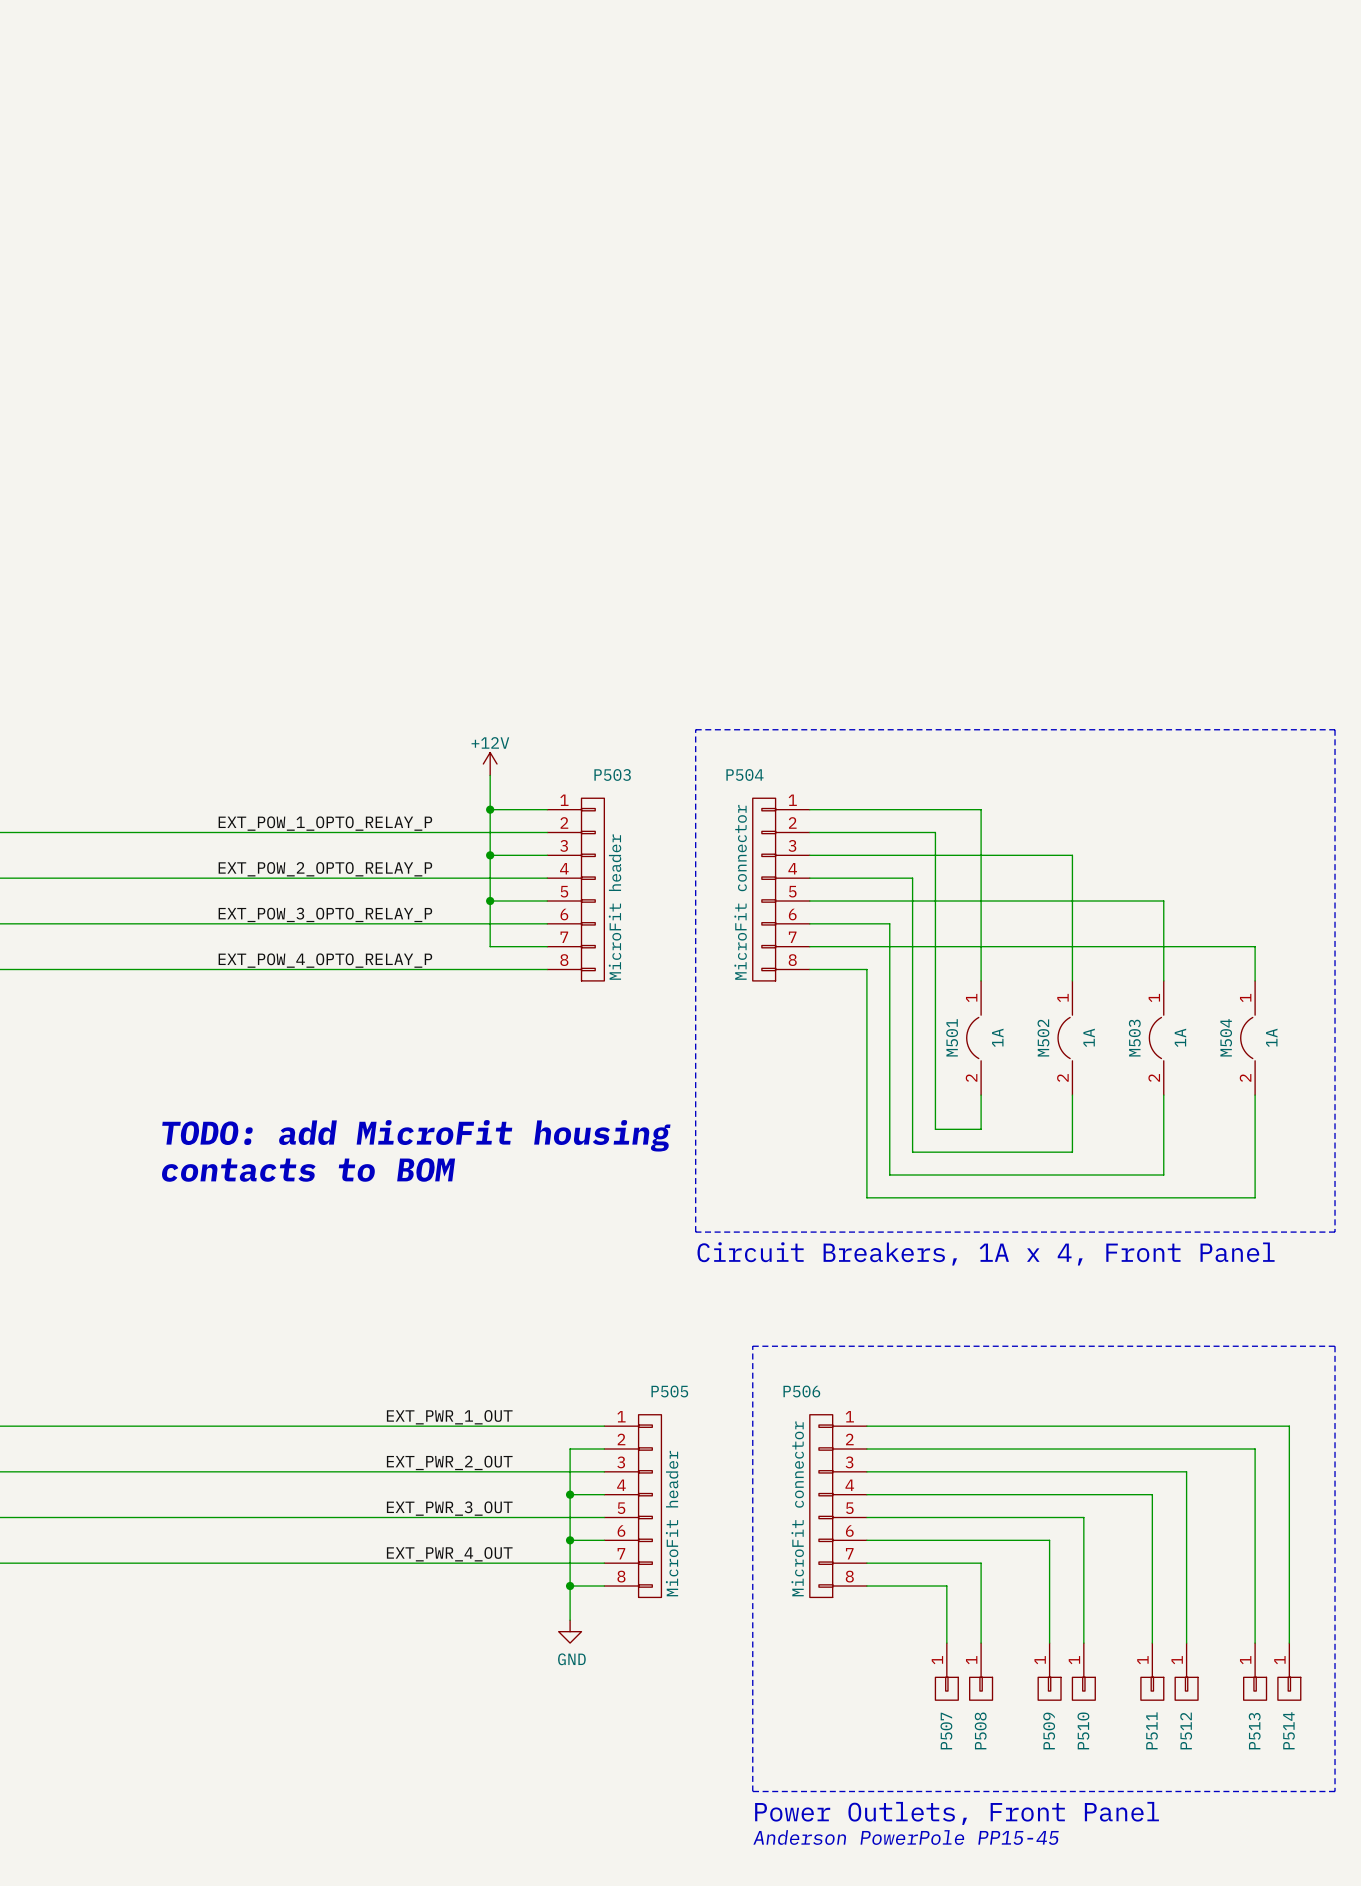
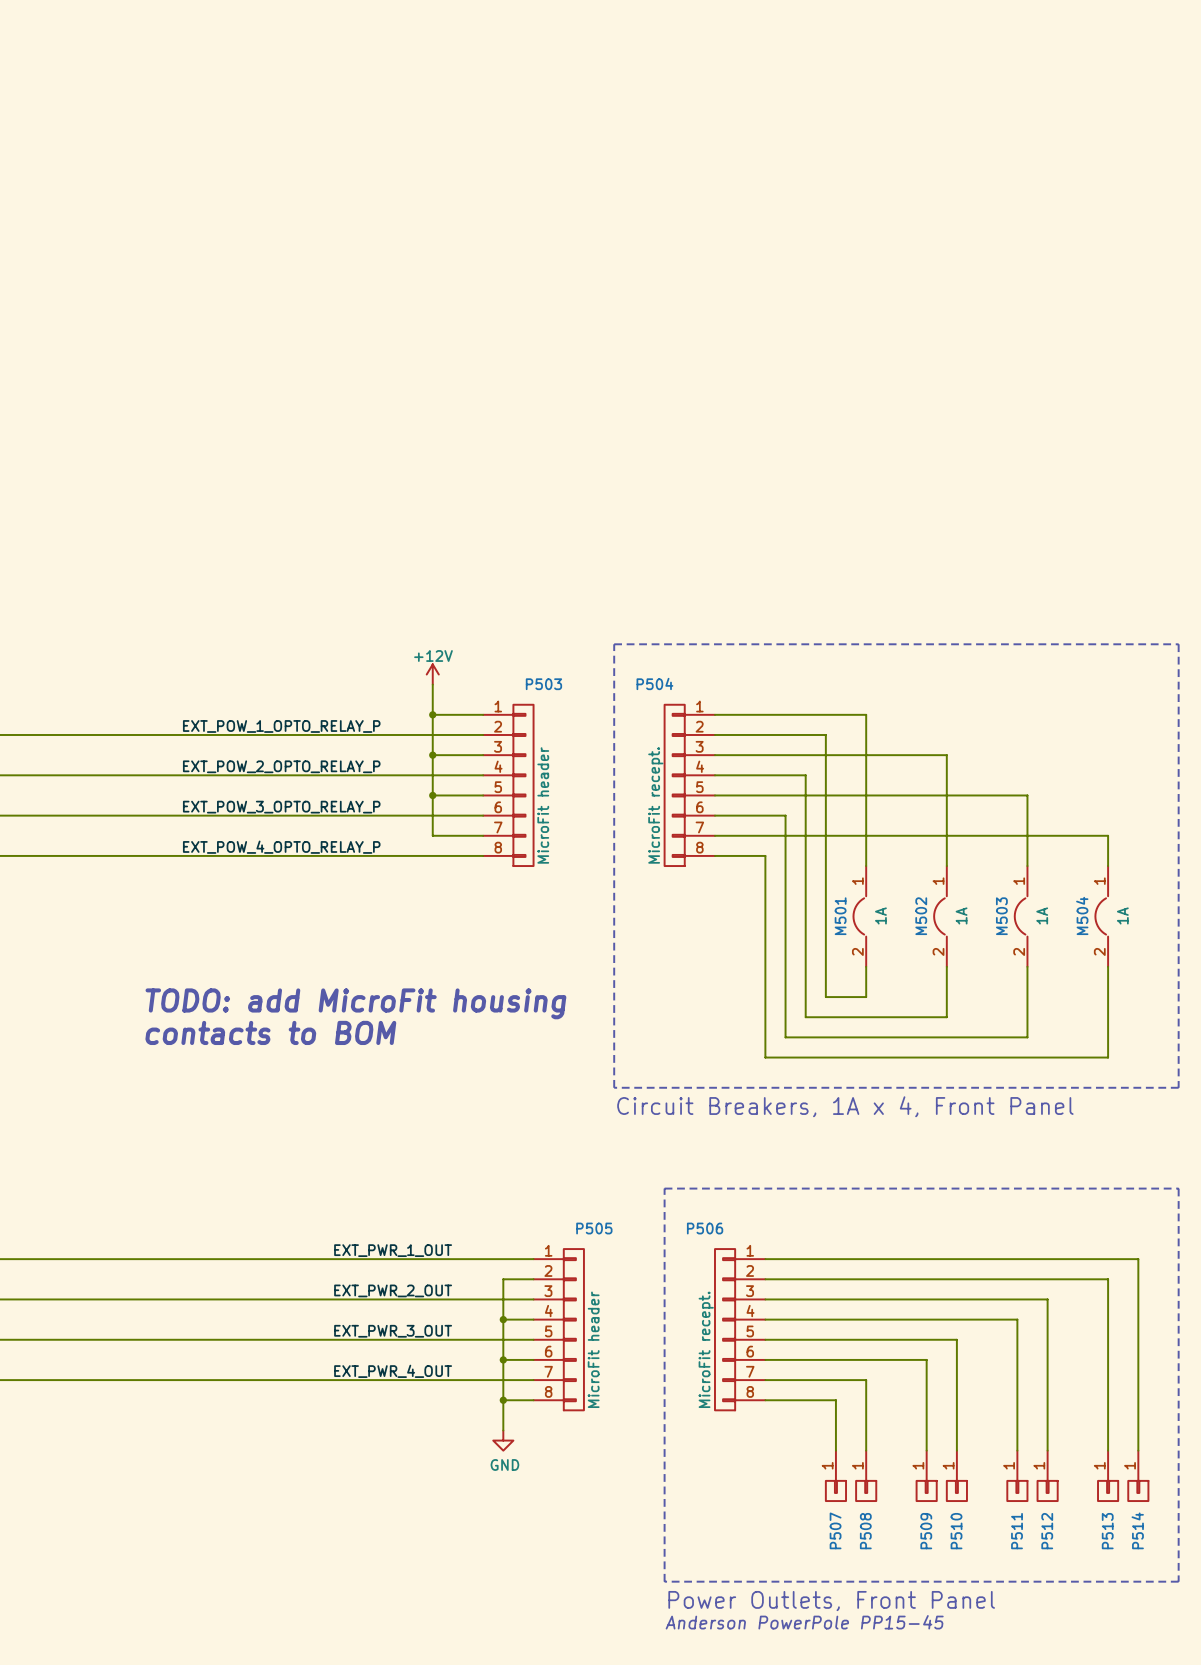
P504 value: MicroFit connector (740, 892) -> MicroFit recept. (655, 805)
P506 value: MicroFit connector (797, 1508) -> MicroFit recept. (706, 1349)

